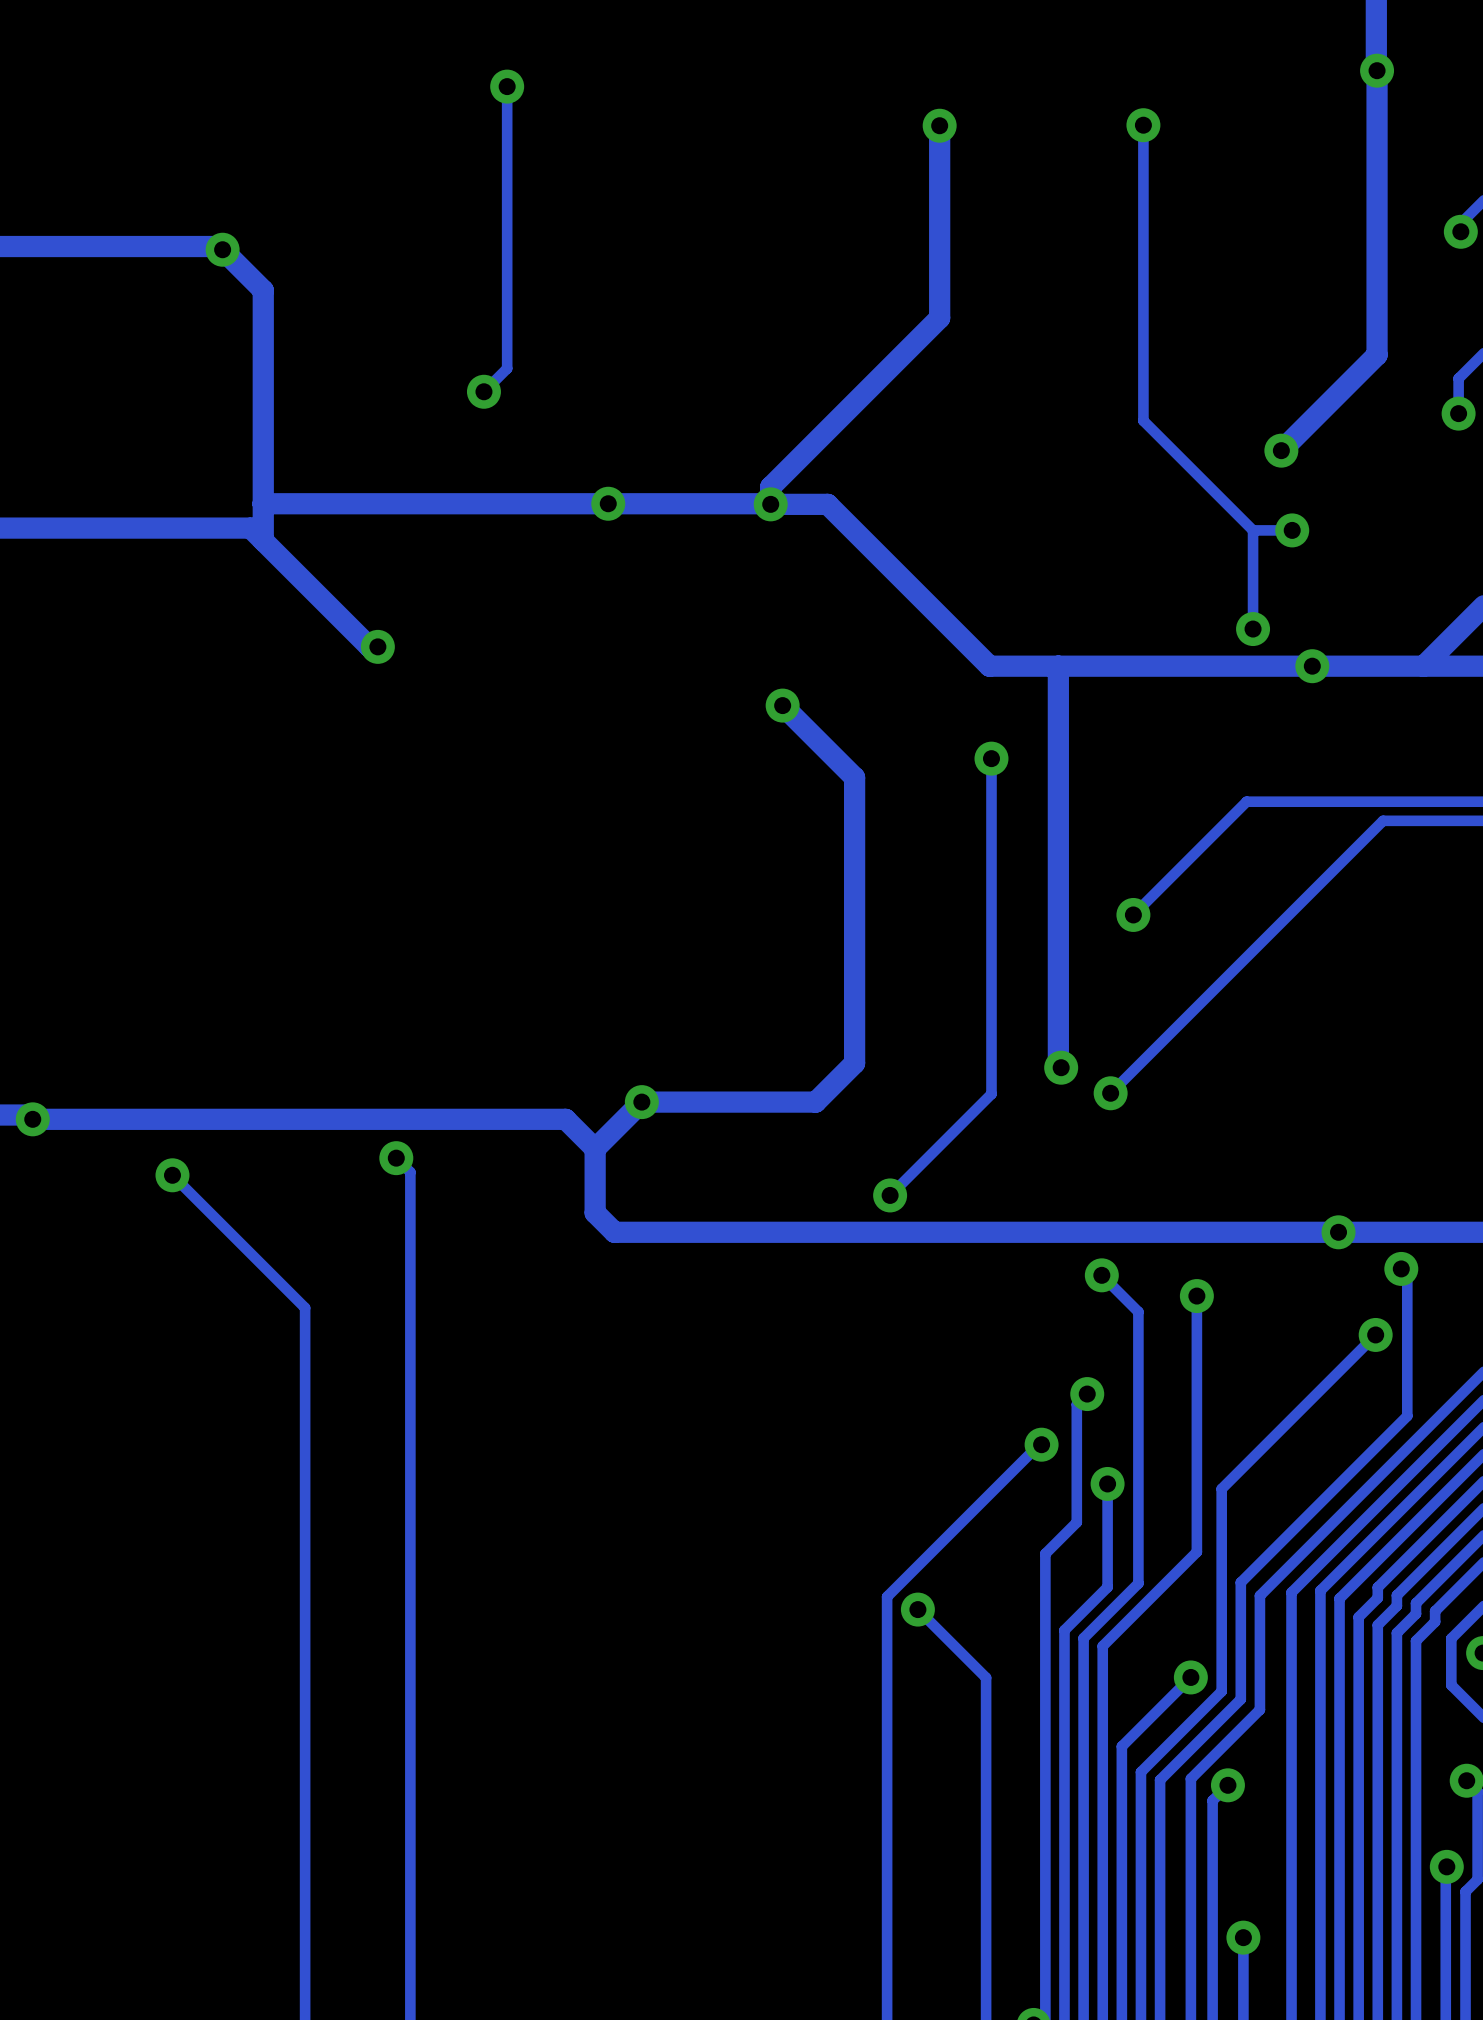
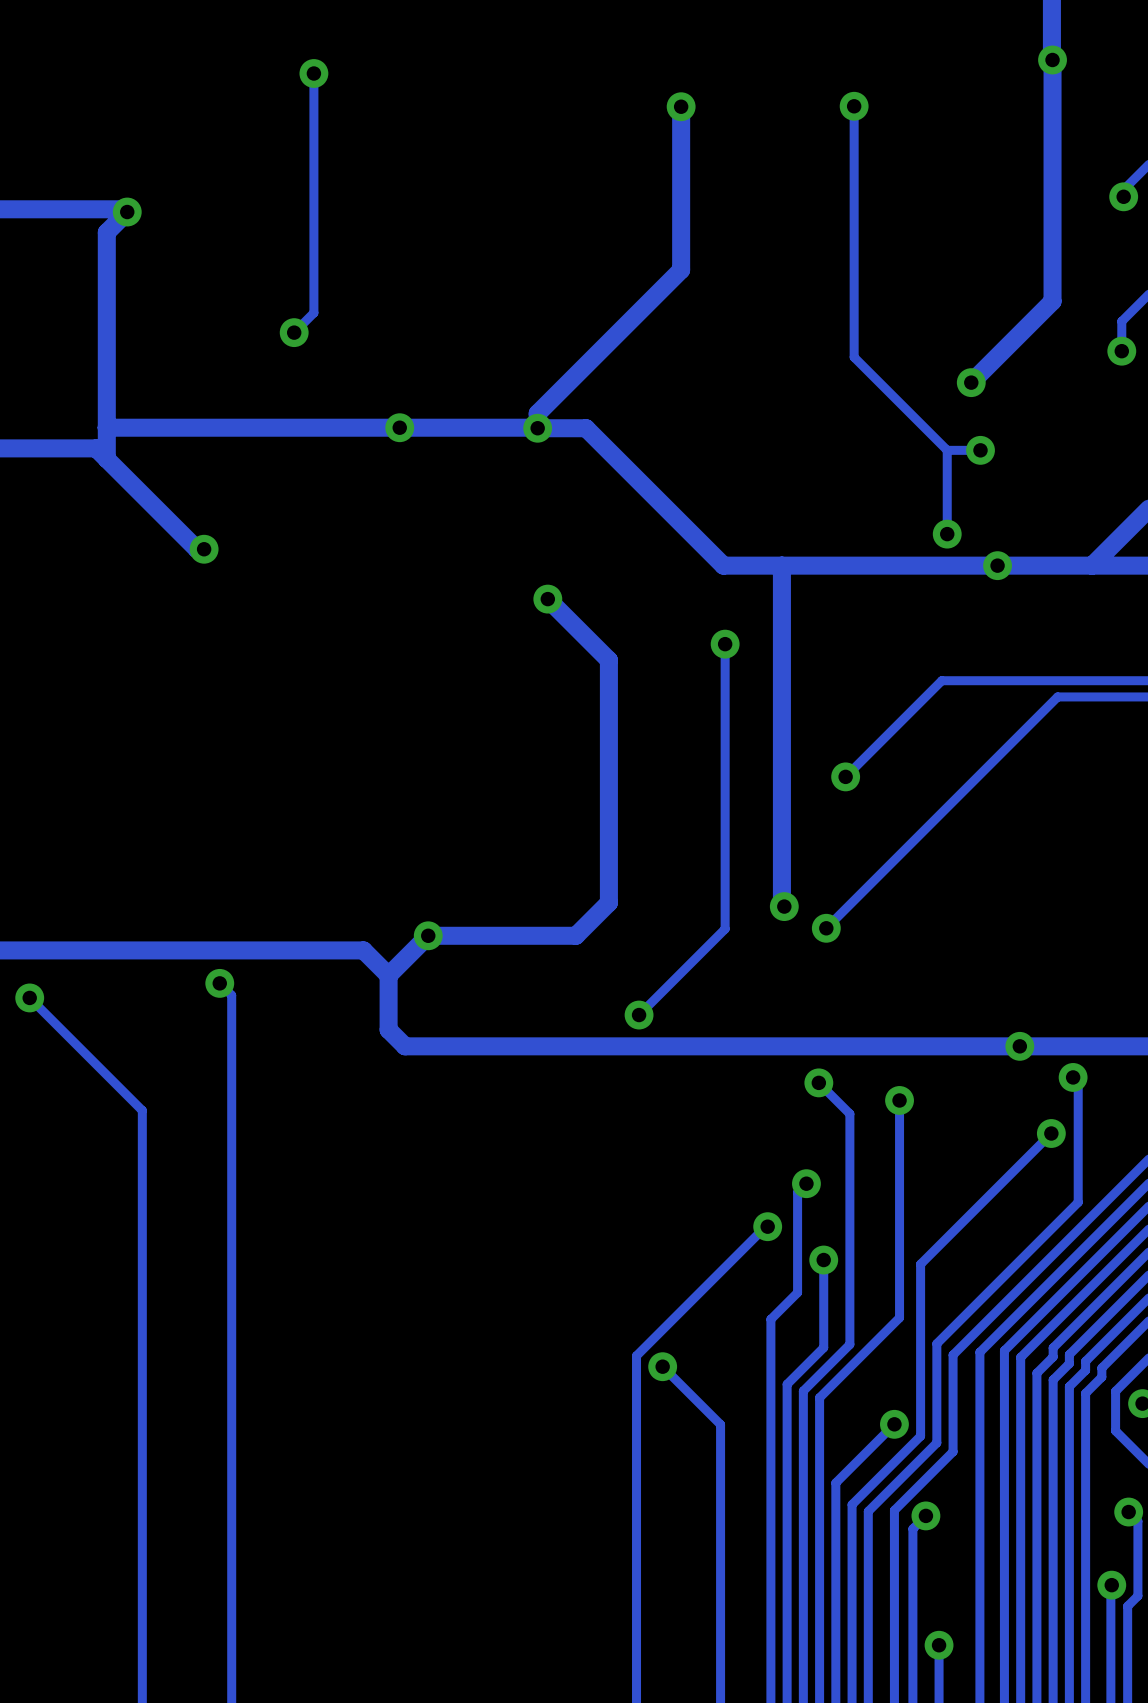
track: (219, 246) (263, 290) -> (69, 209) (124, 209) (127, 212) (106, 232) (106, 246)
via position: (222, 249) -> (127, 212)

